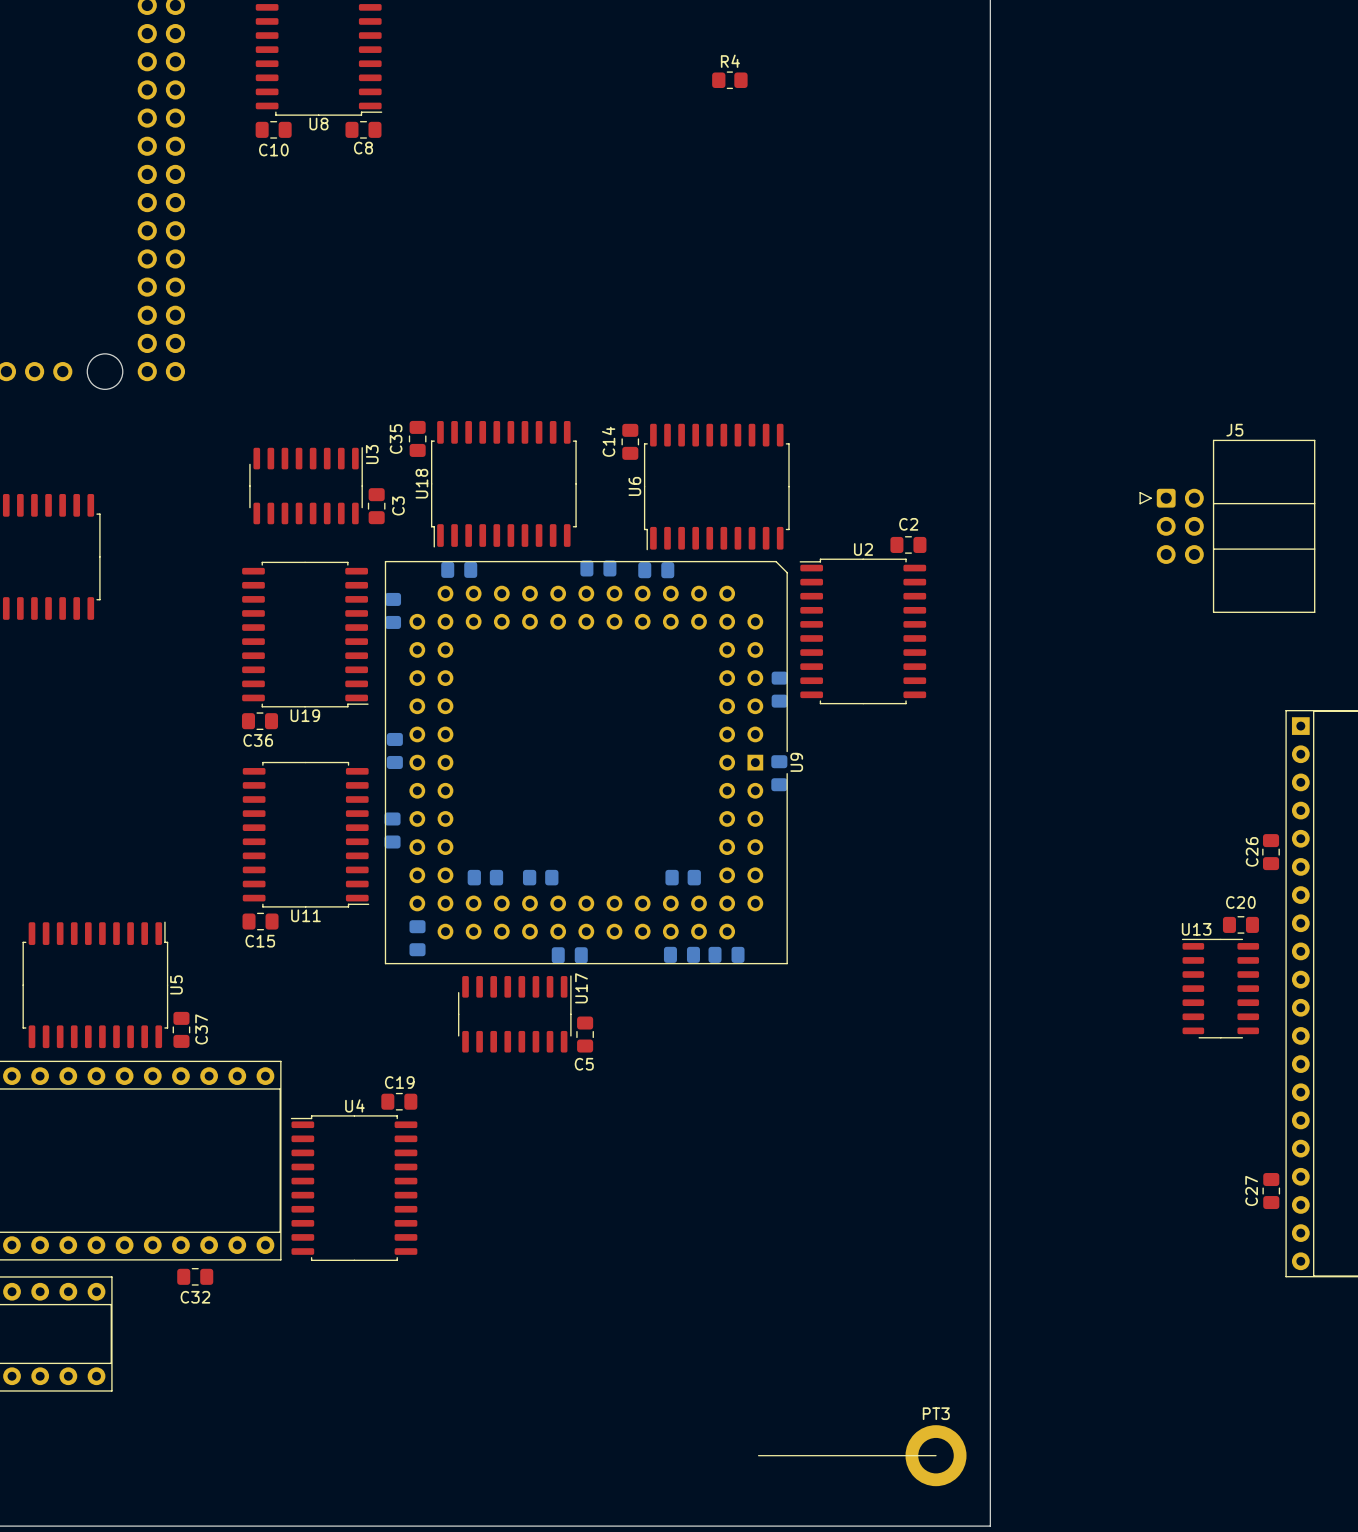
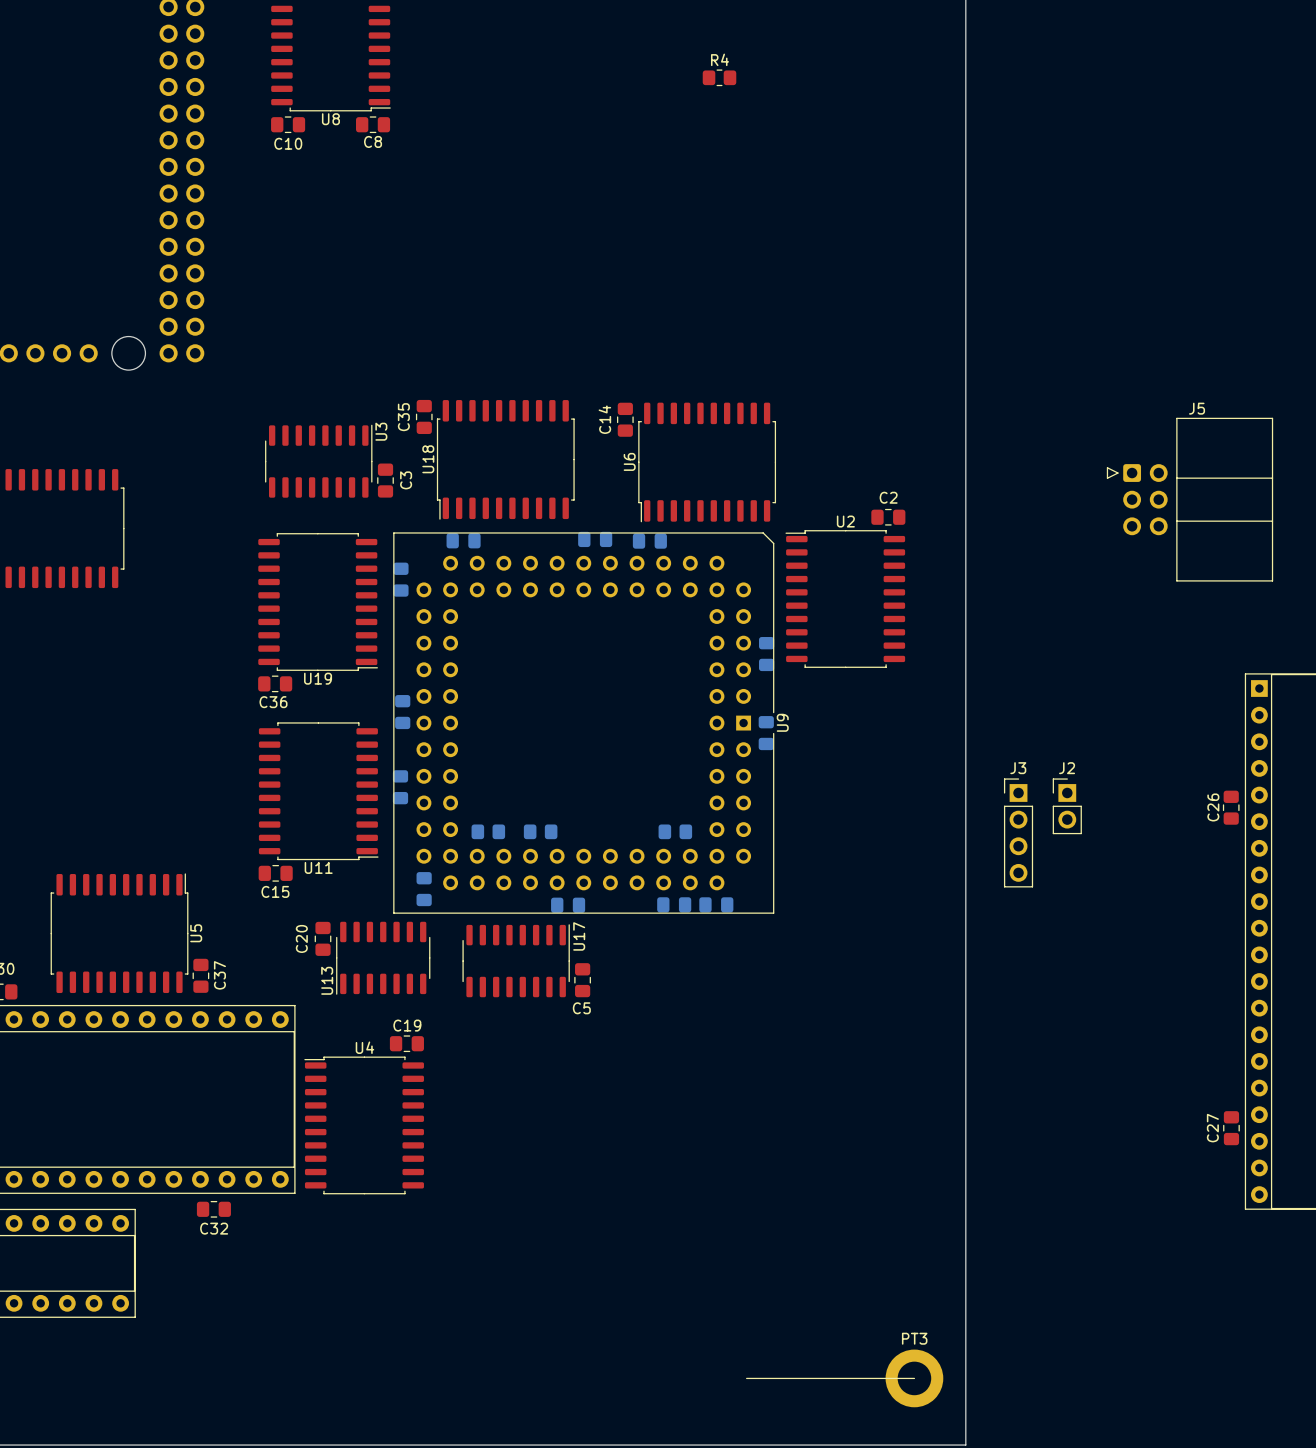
J2: none -> (1067, 806)
J3: none -> (1018, 832)
C20 name position: C20 (1240, 902) -> C20 (301, 938)
C20 rotation: 0° (1240, 924) -> 90° clockwise (323, 938)
C20 position: (1240, 924) -> (323, 938)
U13 rotation: 0° (1220, 988) -> 90° counterclockwise (383, 958)
U13 position: (1220, 988) -> (383, 958)

